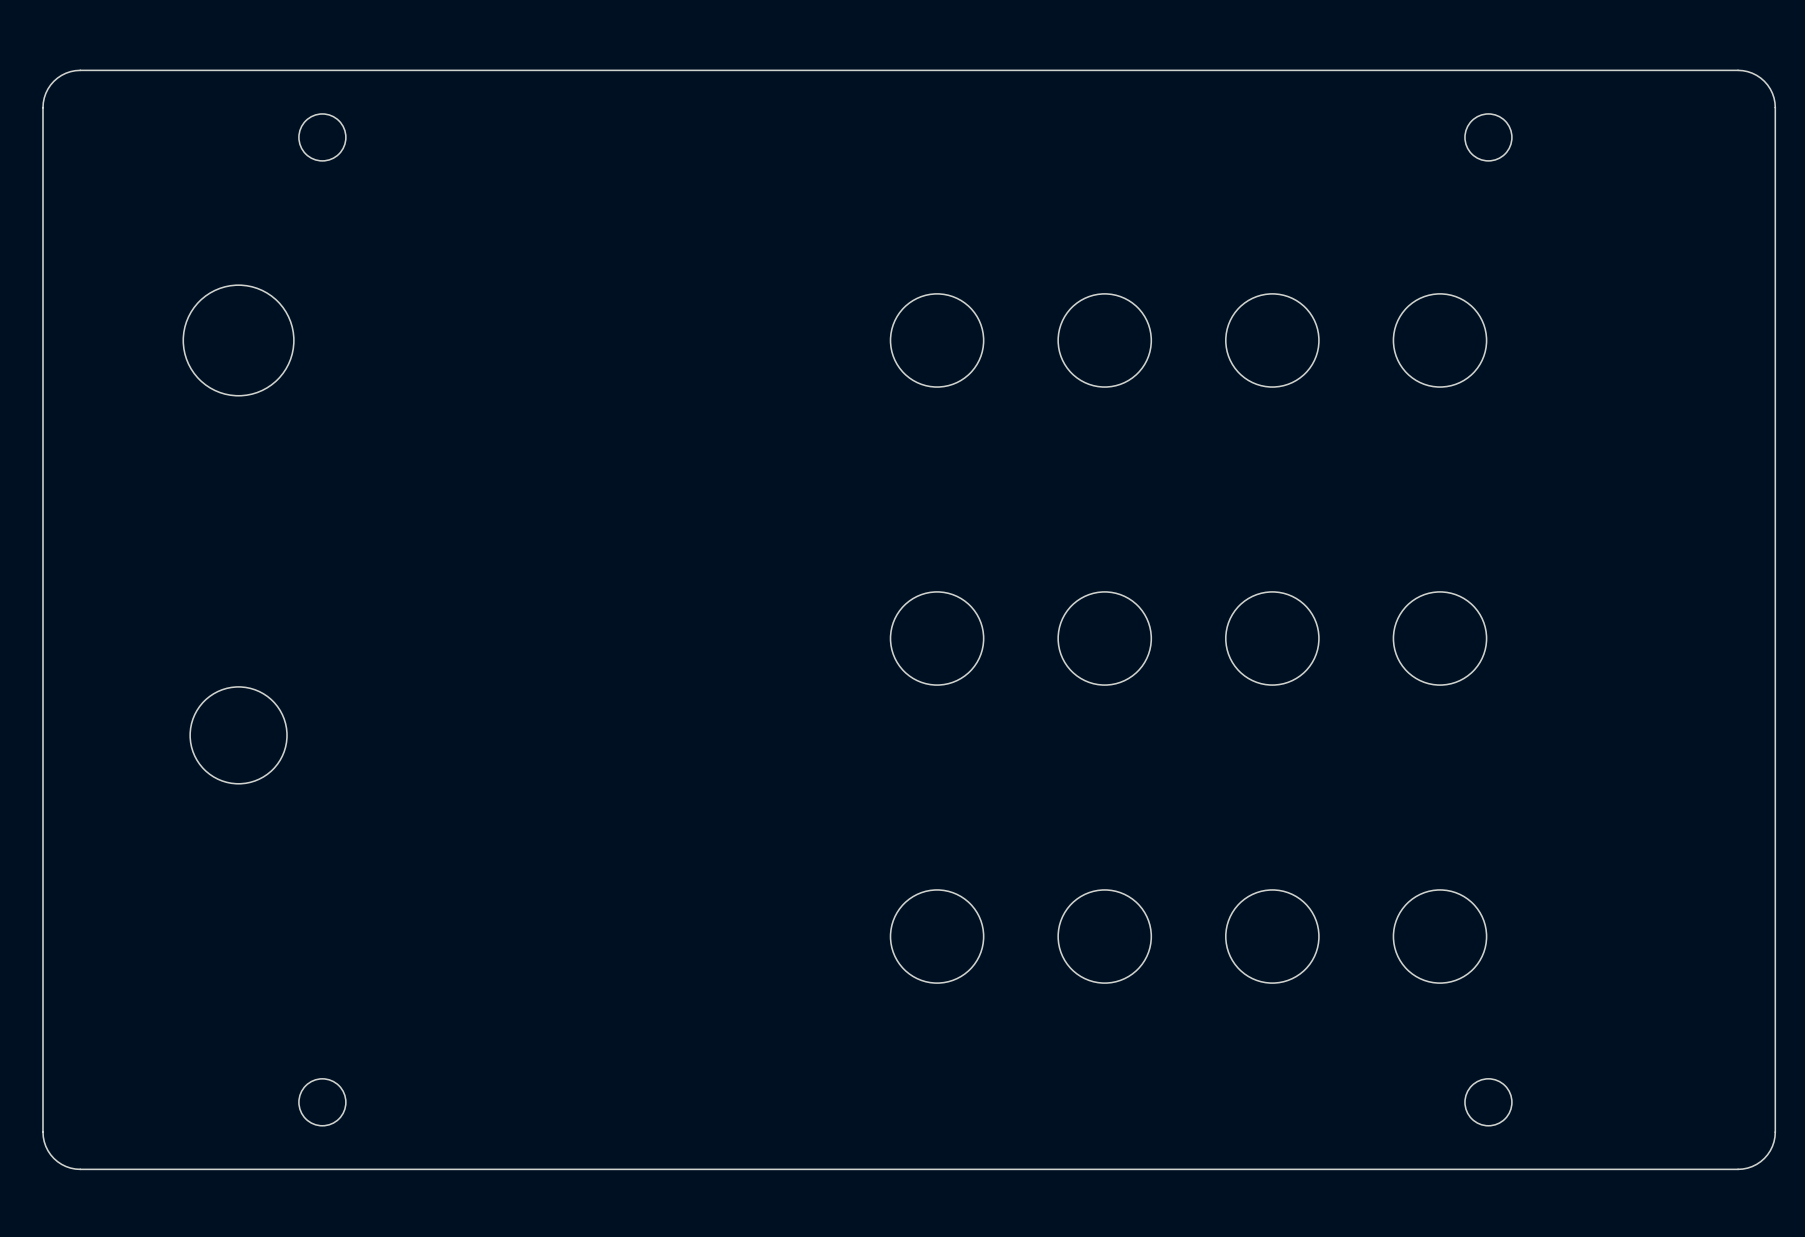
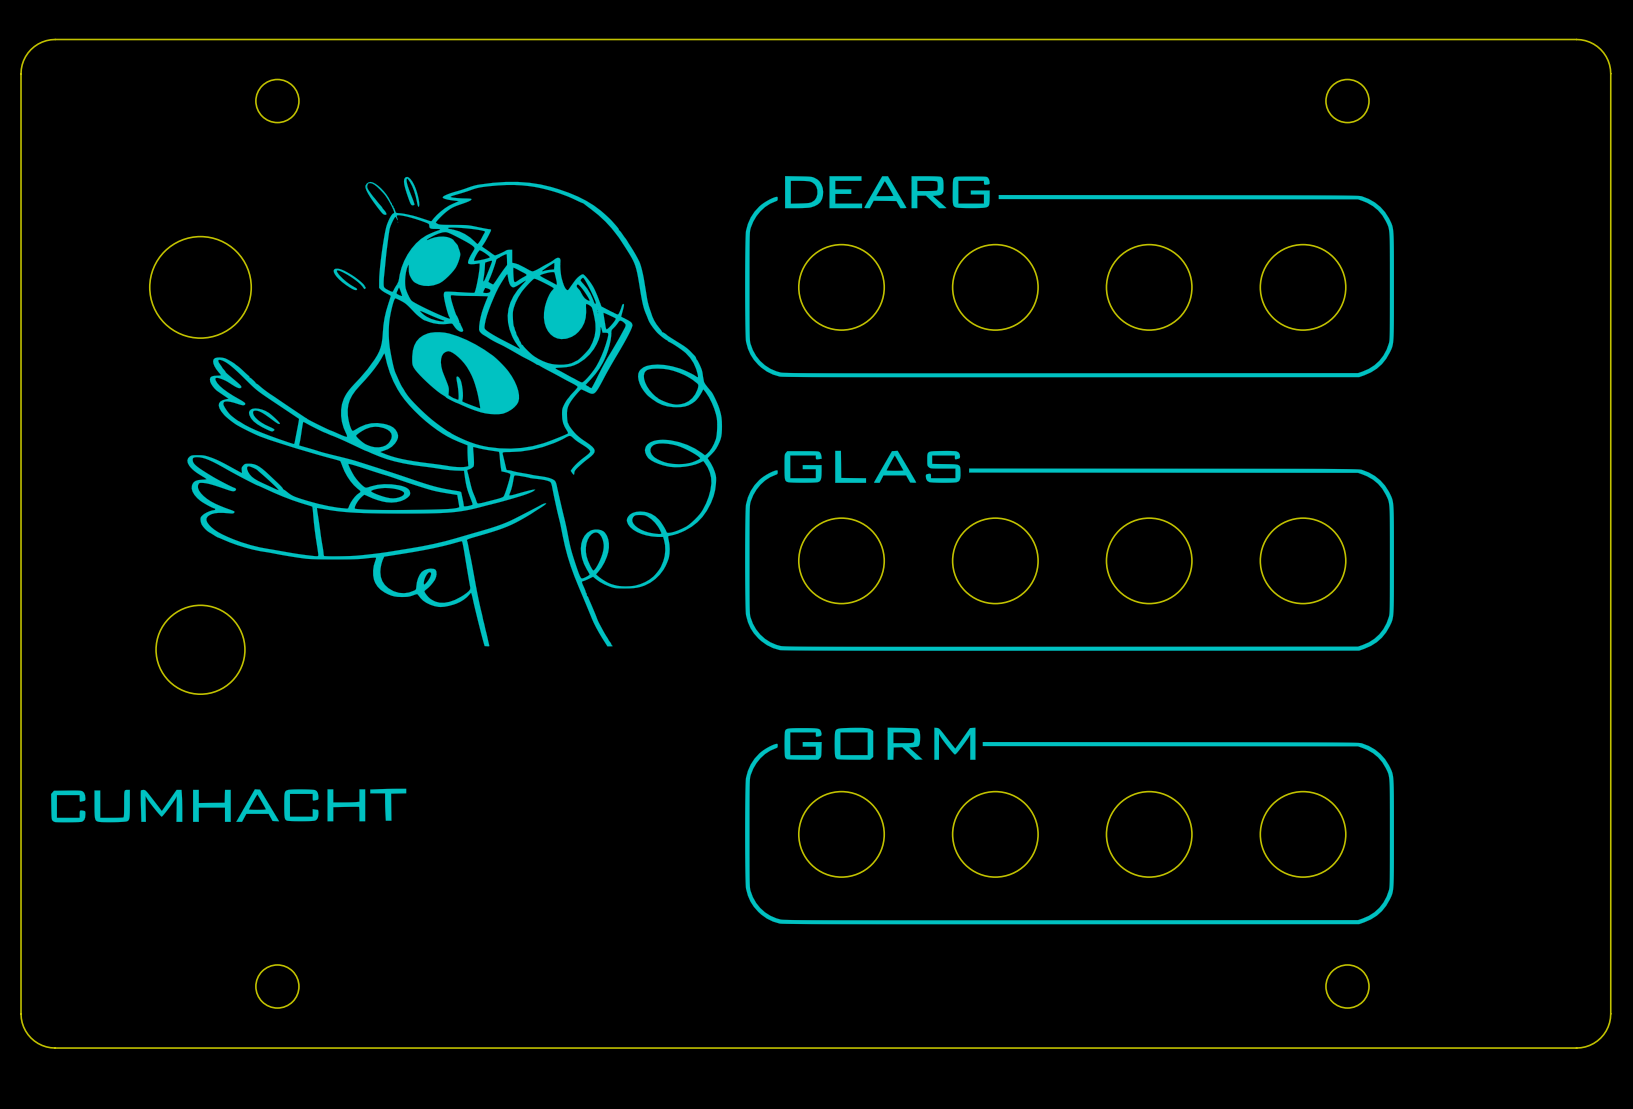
drawing: none -> [51, 176, 1395, 925]

